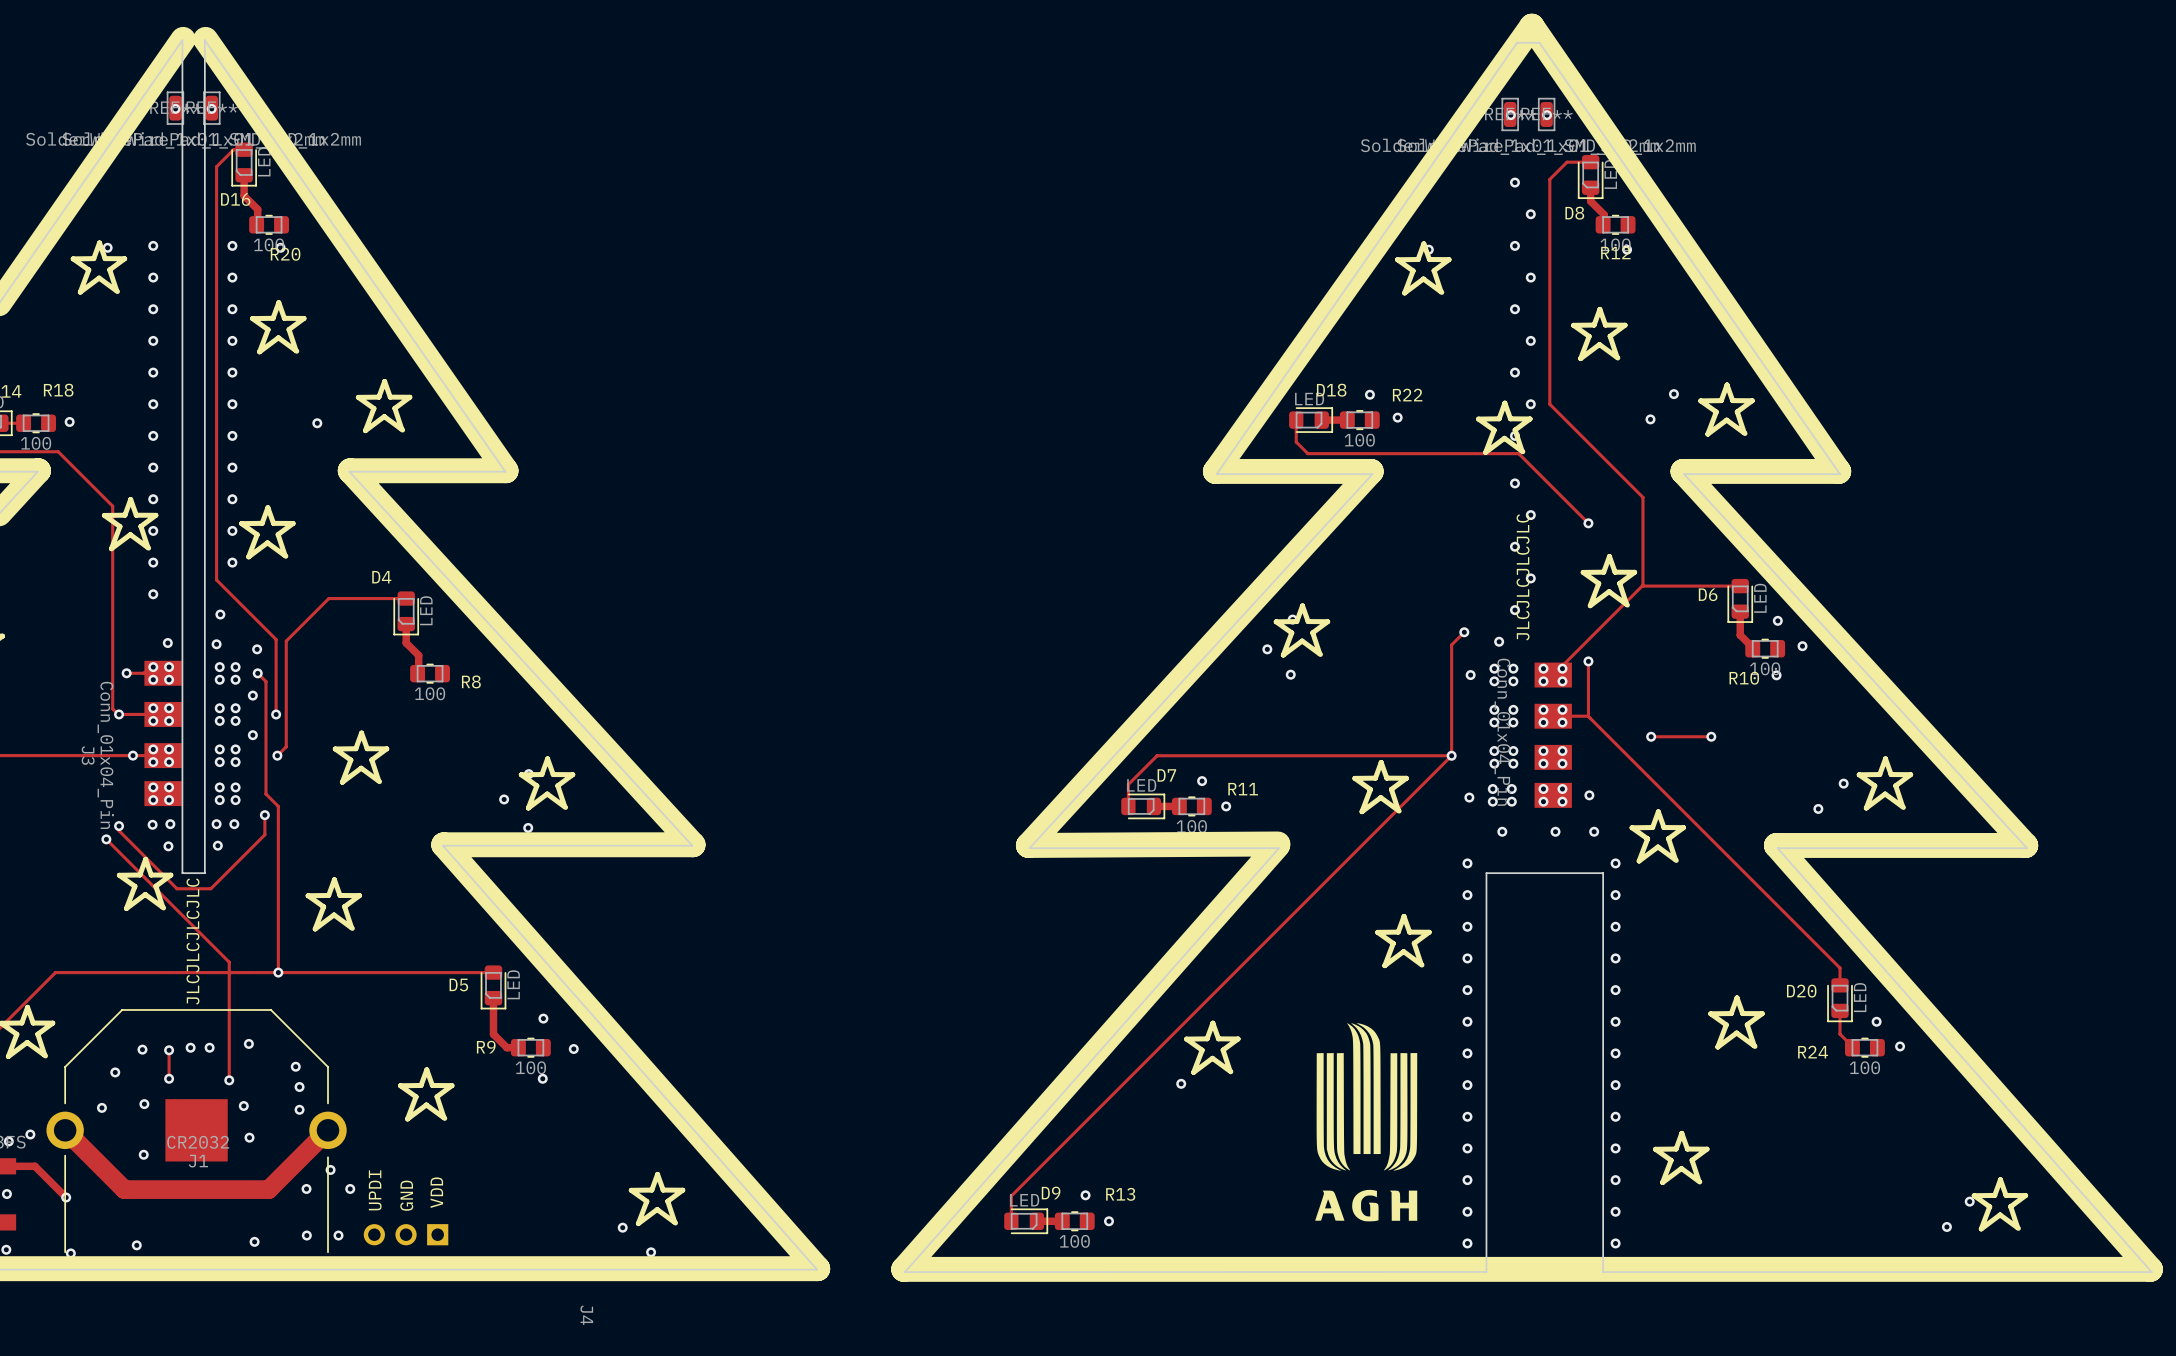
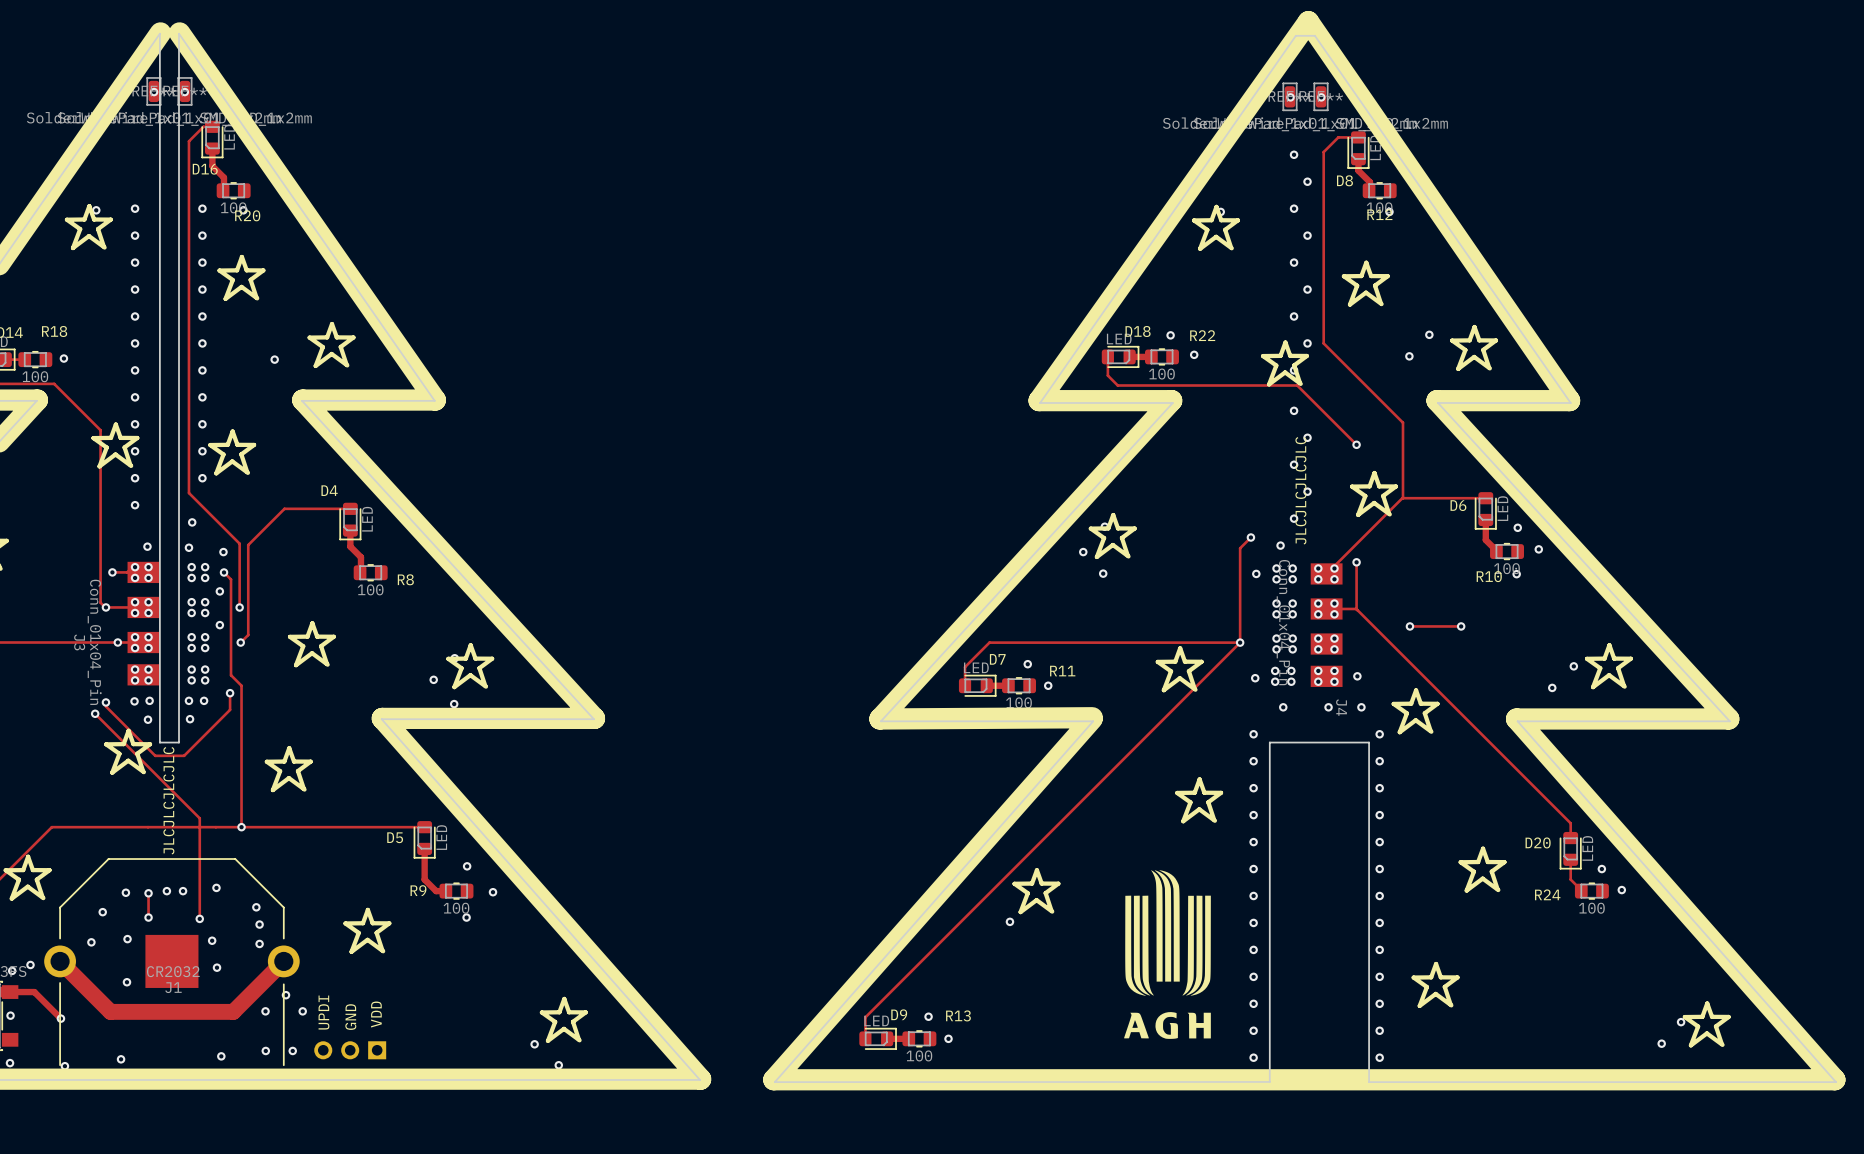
J4 name position: J4 (586, 1315) -> J4 (1341, 707)

